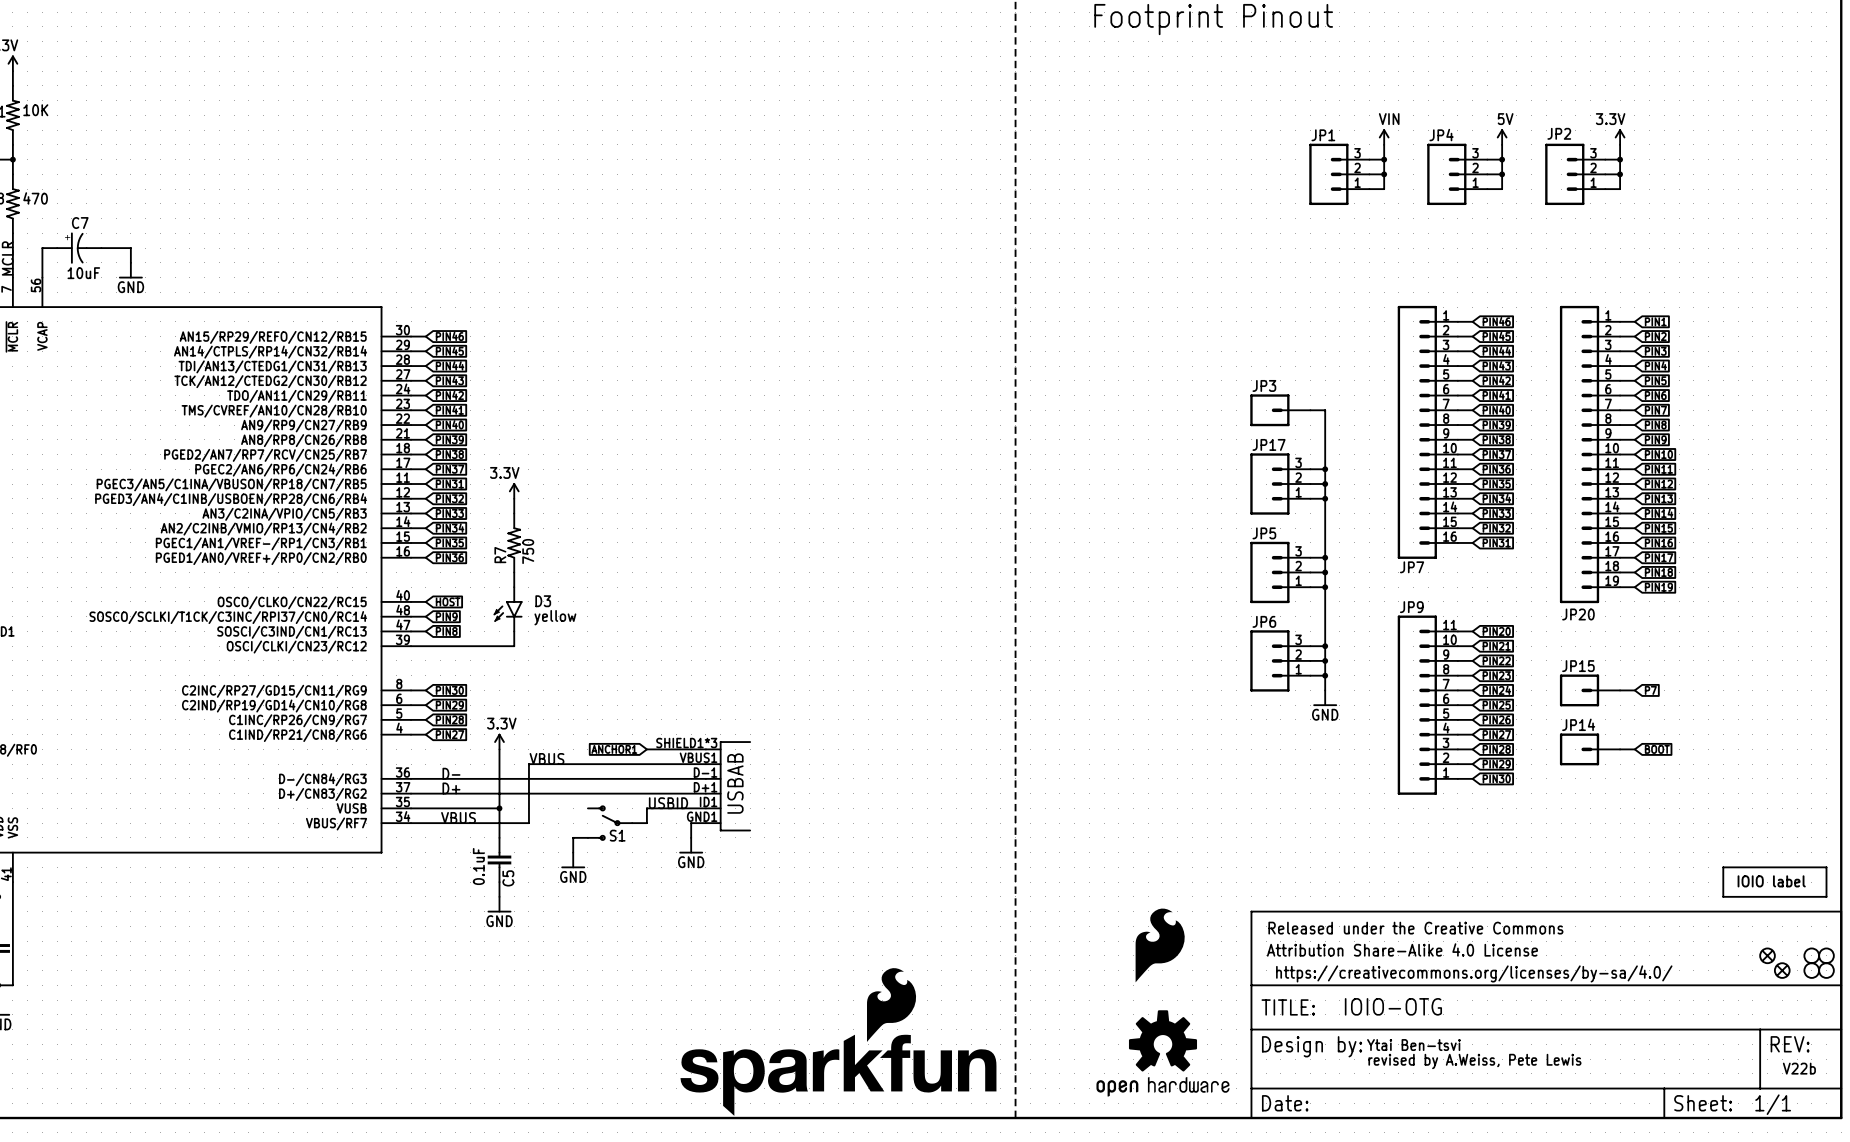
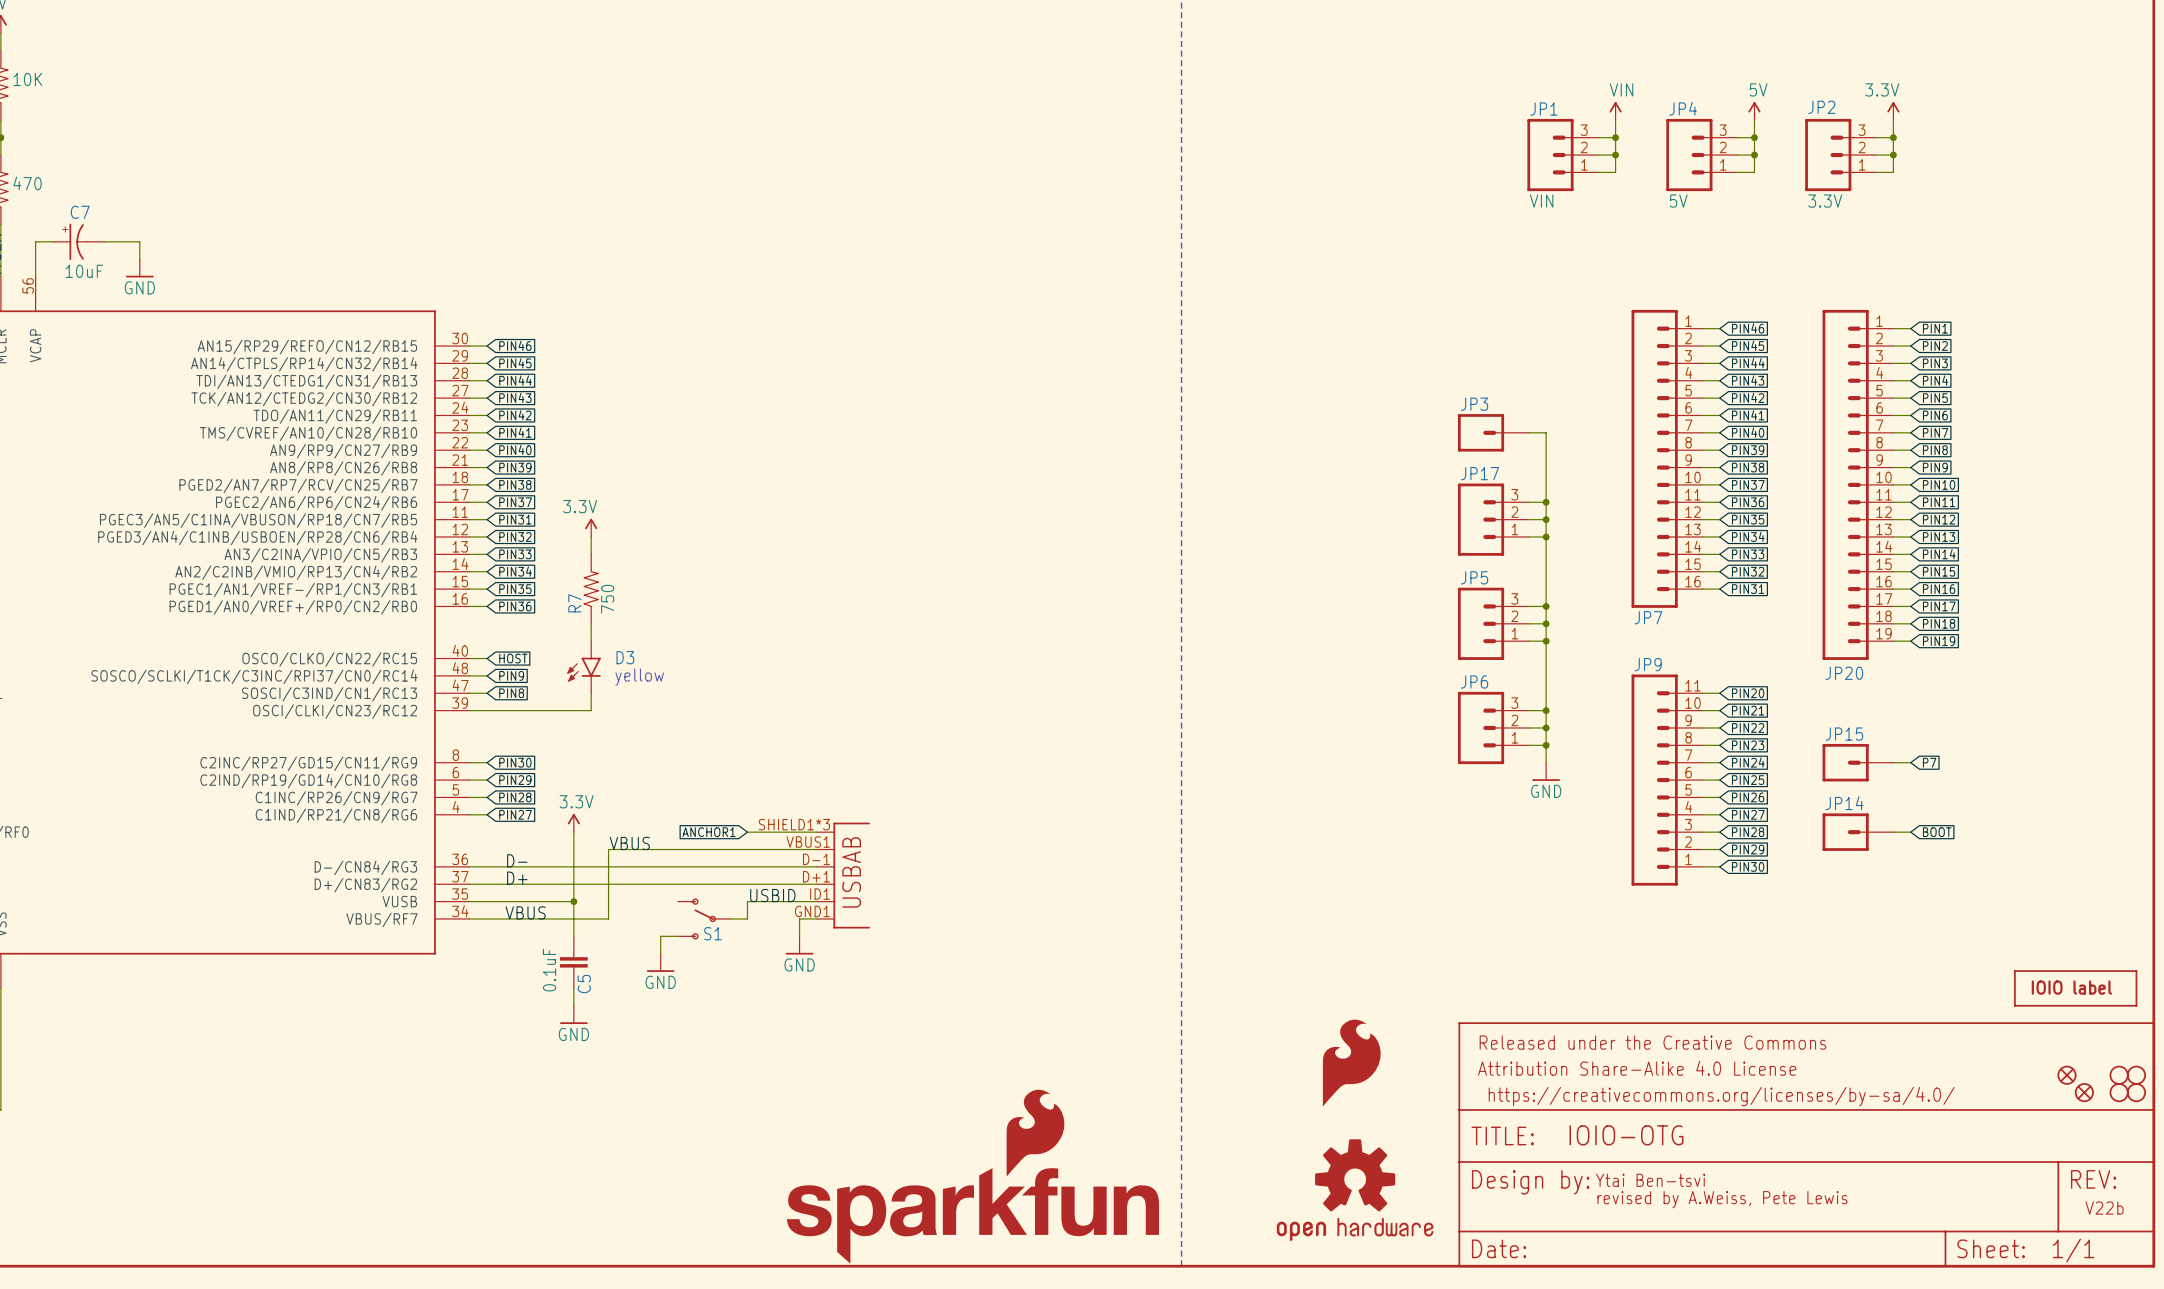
JP1 value: none -> VIN (1541, 201)
JP4 value: none -> 5V (1678, 201)
JP2 value: none -> 3.3V (1825, 201)

